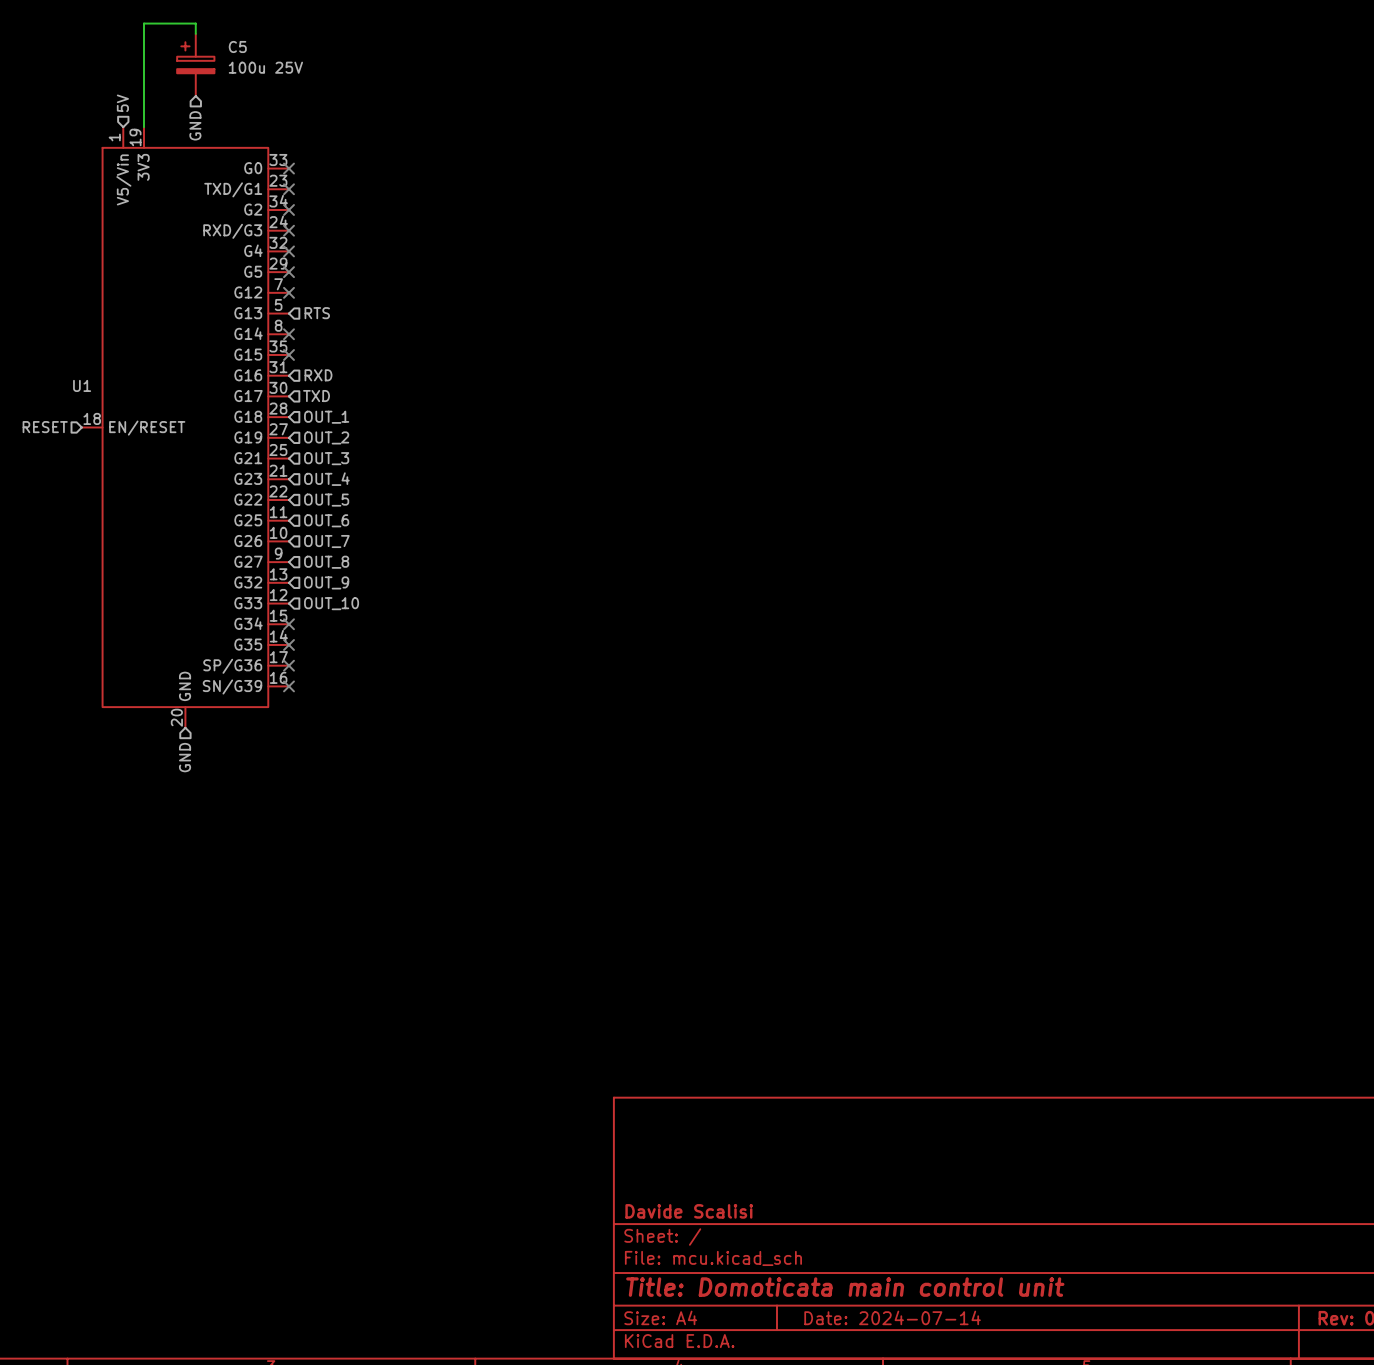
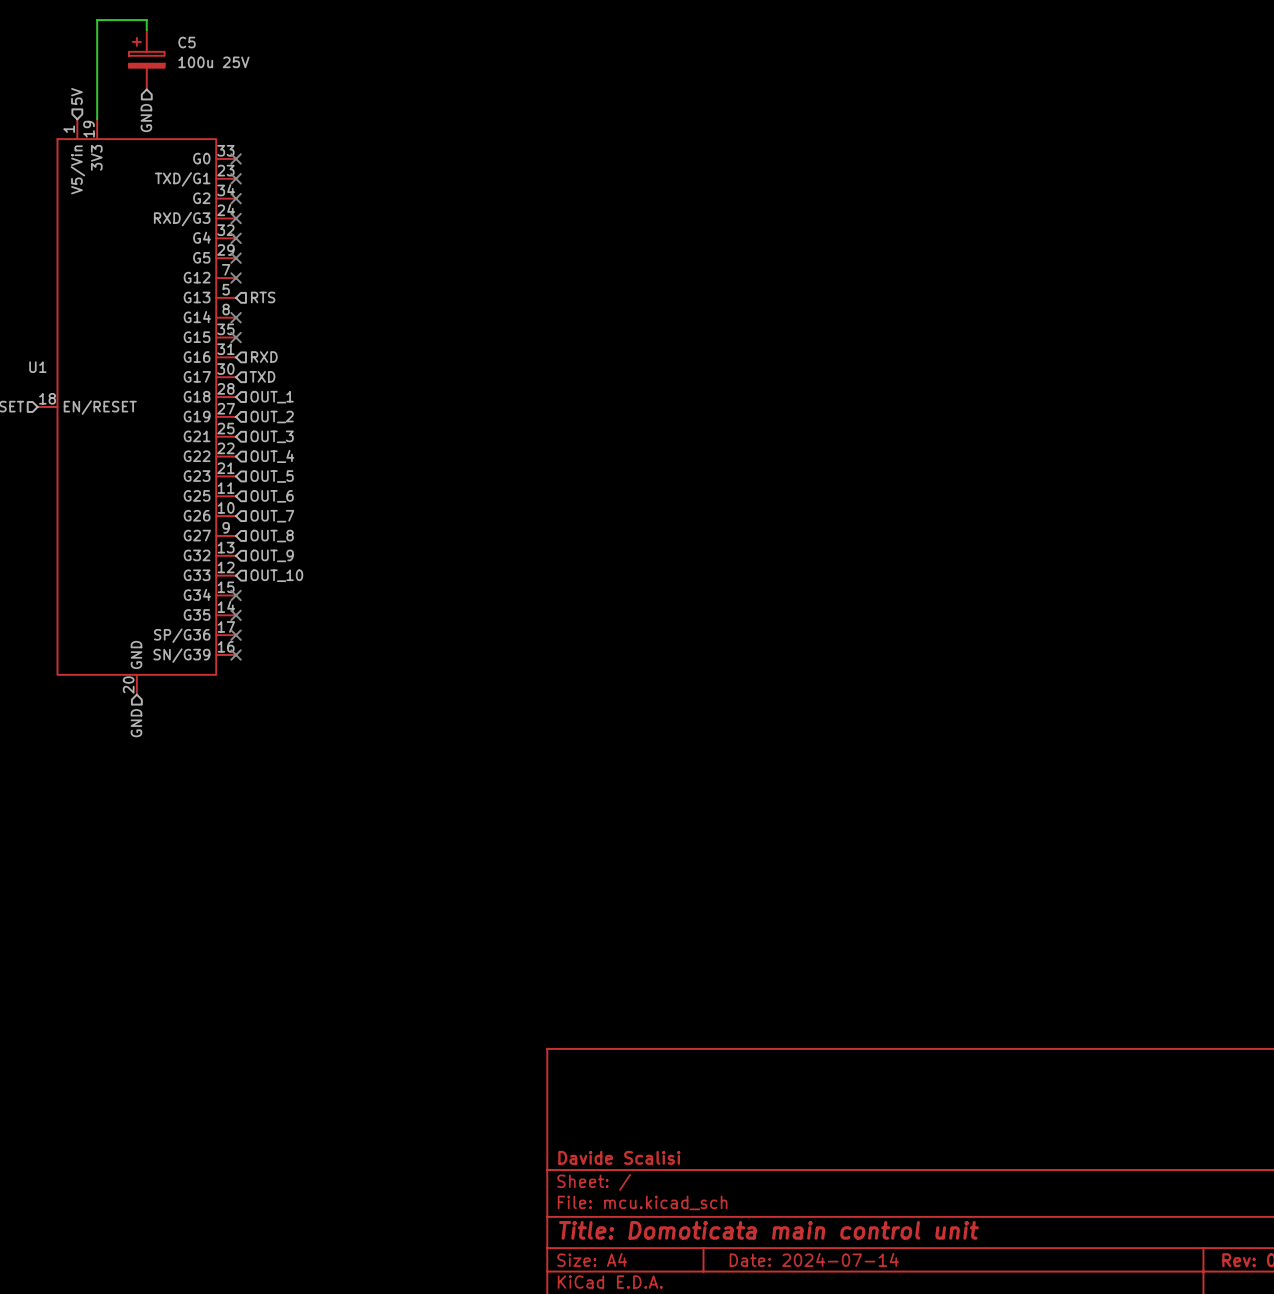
U1 pin number: 21 (278, 470) -> 22 (225, 448)
U1 pin name: G23 (248, 478) -> G22 (197, 456)
U1 pin number: 22 (278, 491) -> 21 (225, 468)
U1 pin name: G22 (248, 499) -> G23 (197, 476)

